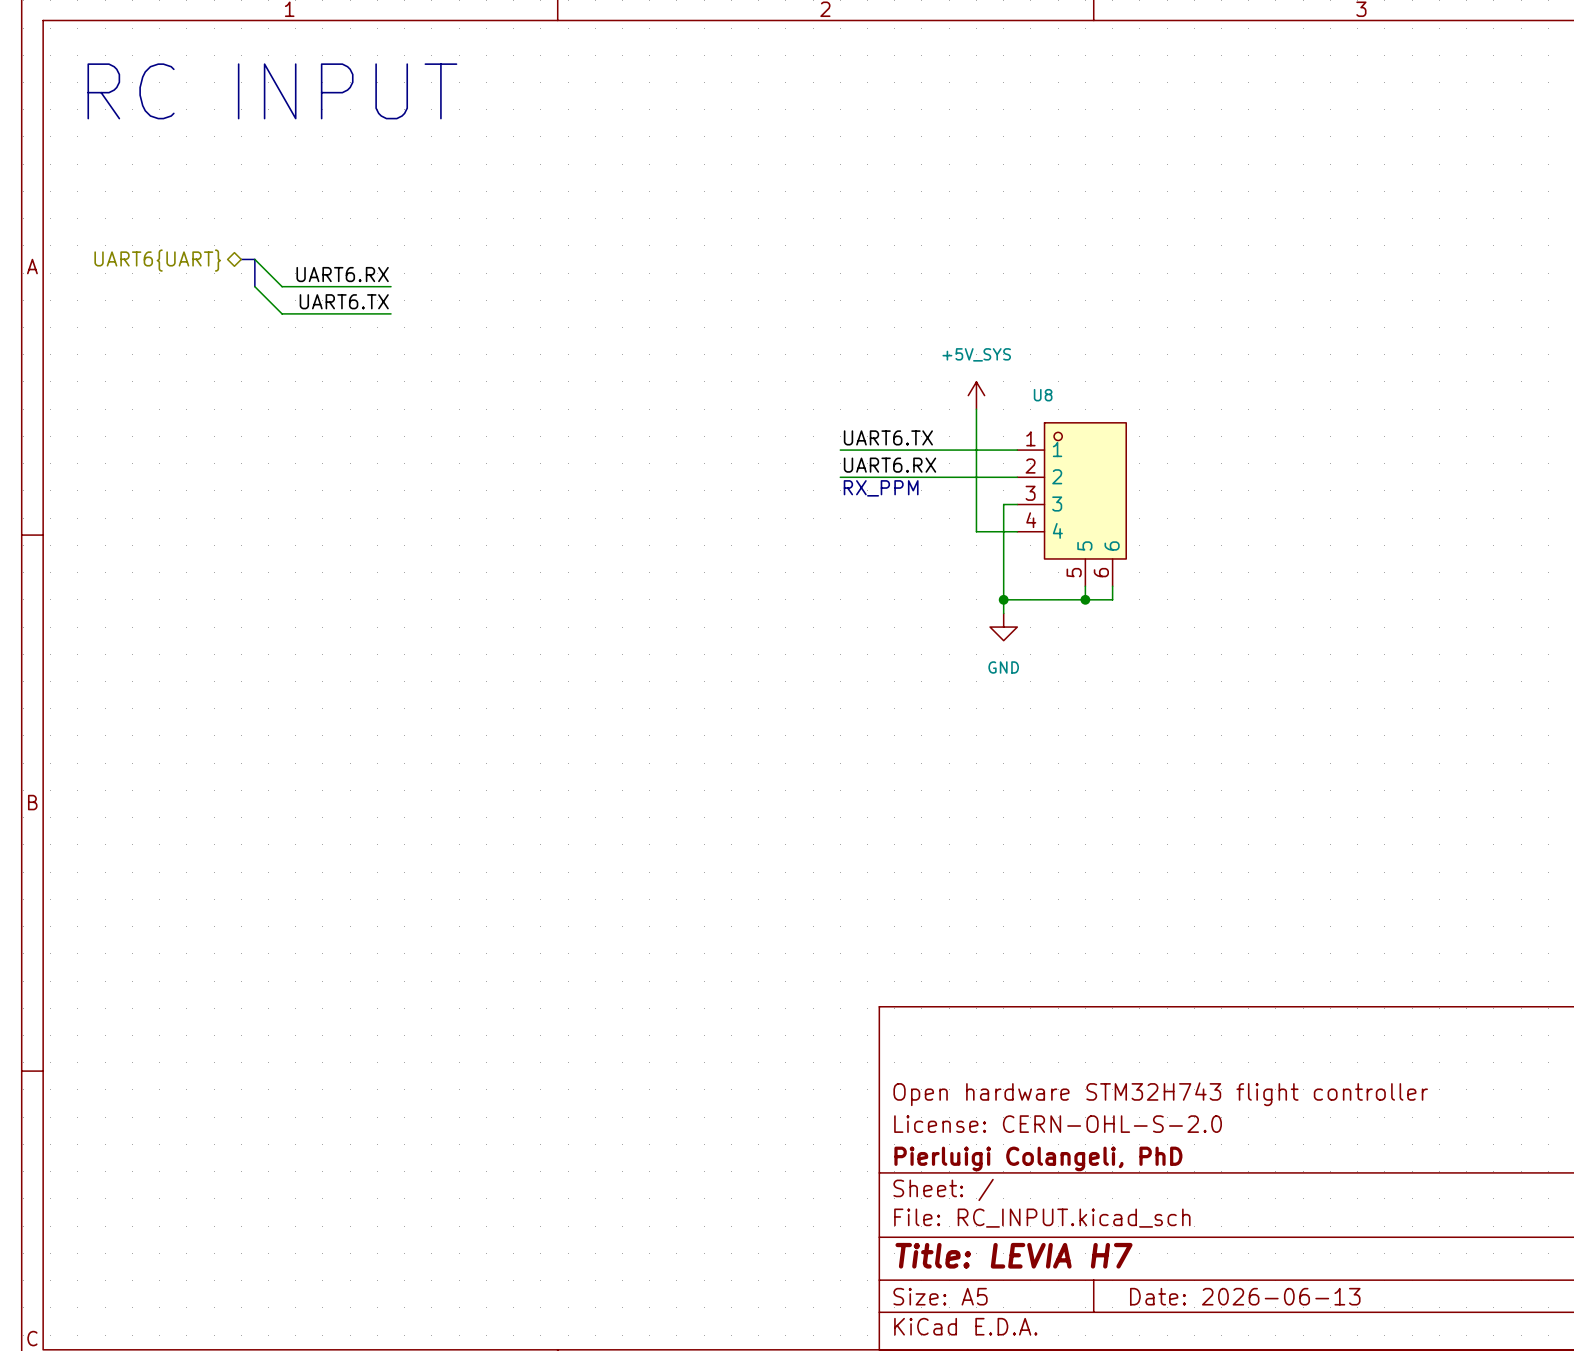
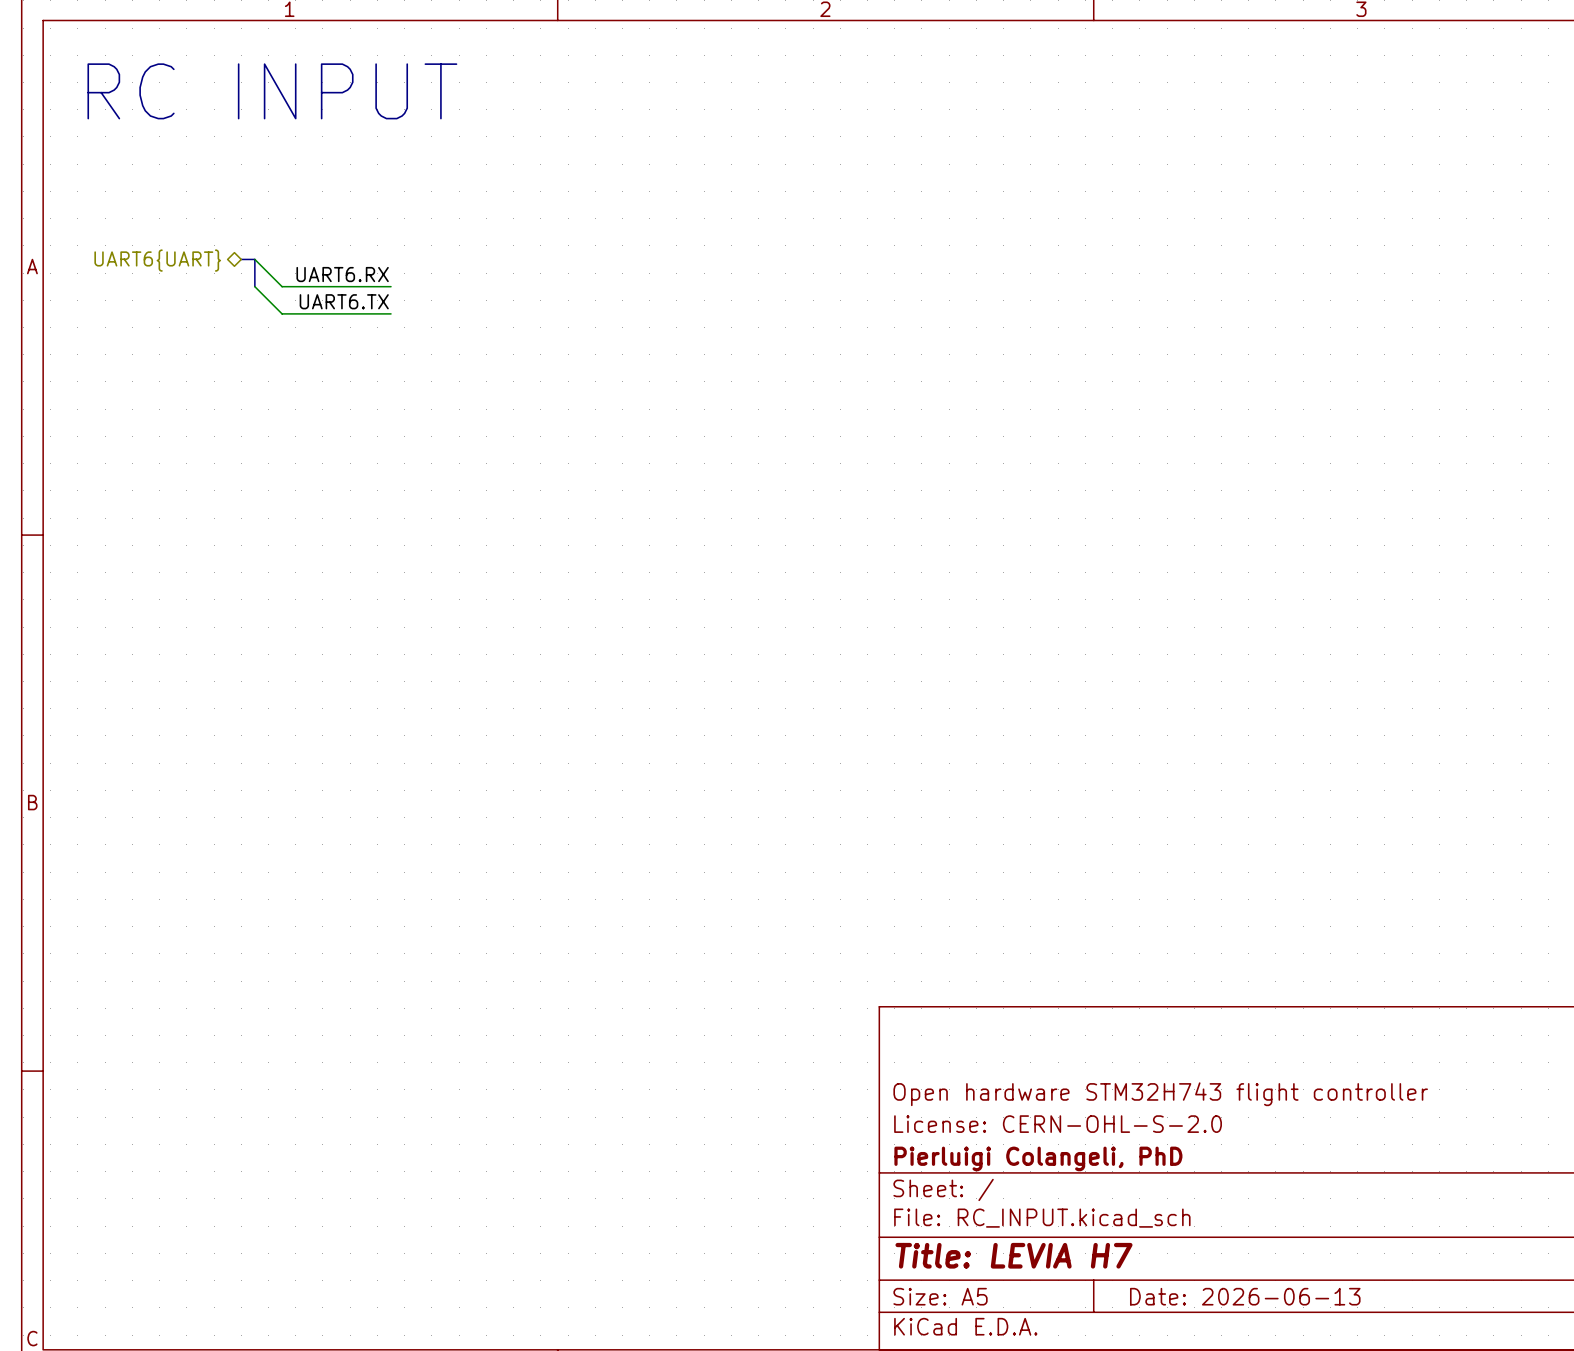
power symbol: +5V_SYS (976, 395) -> none
wire: (976, 409) (976, 531) (1017, 531) -> none
label: UART6.TX (888, 437) -> none
wire: (840, 450) (1017, 450) -> none
label: UART6.RX (890, 465) -> none
wire: (840, 477) (1017, 477) -> none
text: RX_PPM (881, 488) -> none
wire: (1017, 504) (1003, 504) (1003, 613) -> none
U8: (1071, 504) -> none
wire: (1085, 586) (1085, 599) -> none
wire: (1112, 586) (1112, 599) (1003, 599) -> none
junction: (1003, 599) -> none
junction: (1085, 599) -> none
power symbol: GND (1003, 627) -> none

